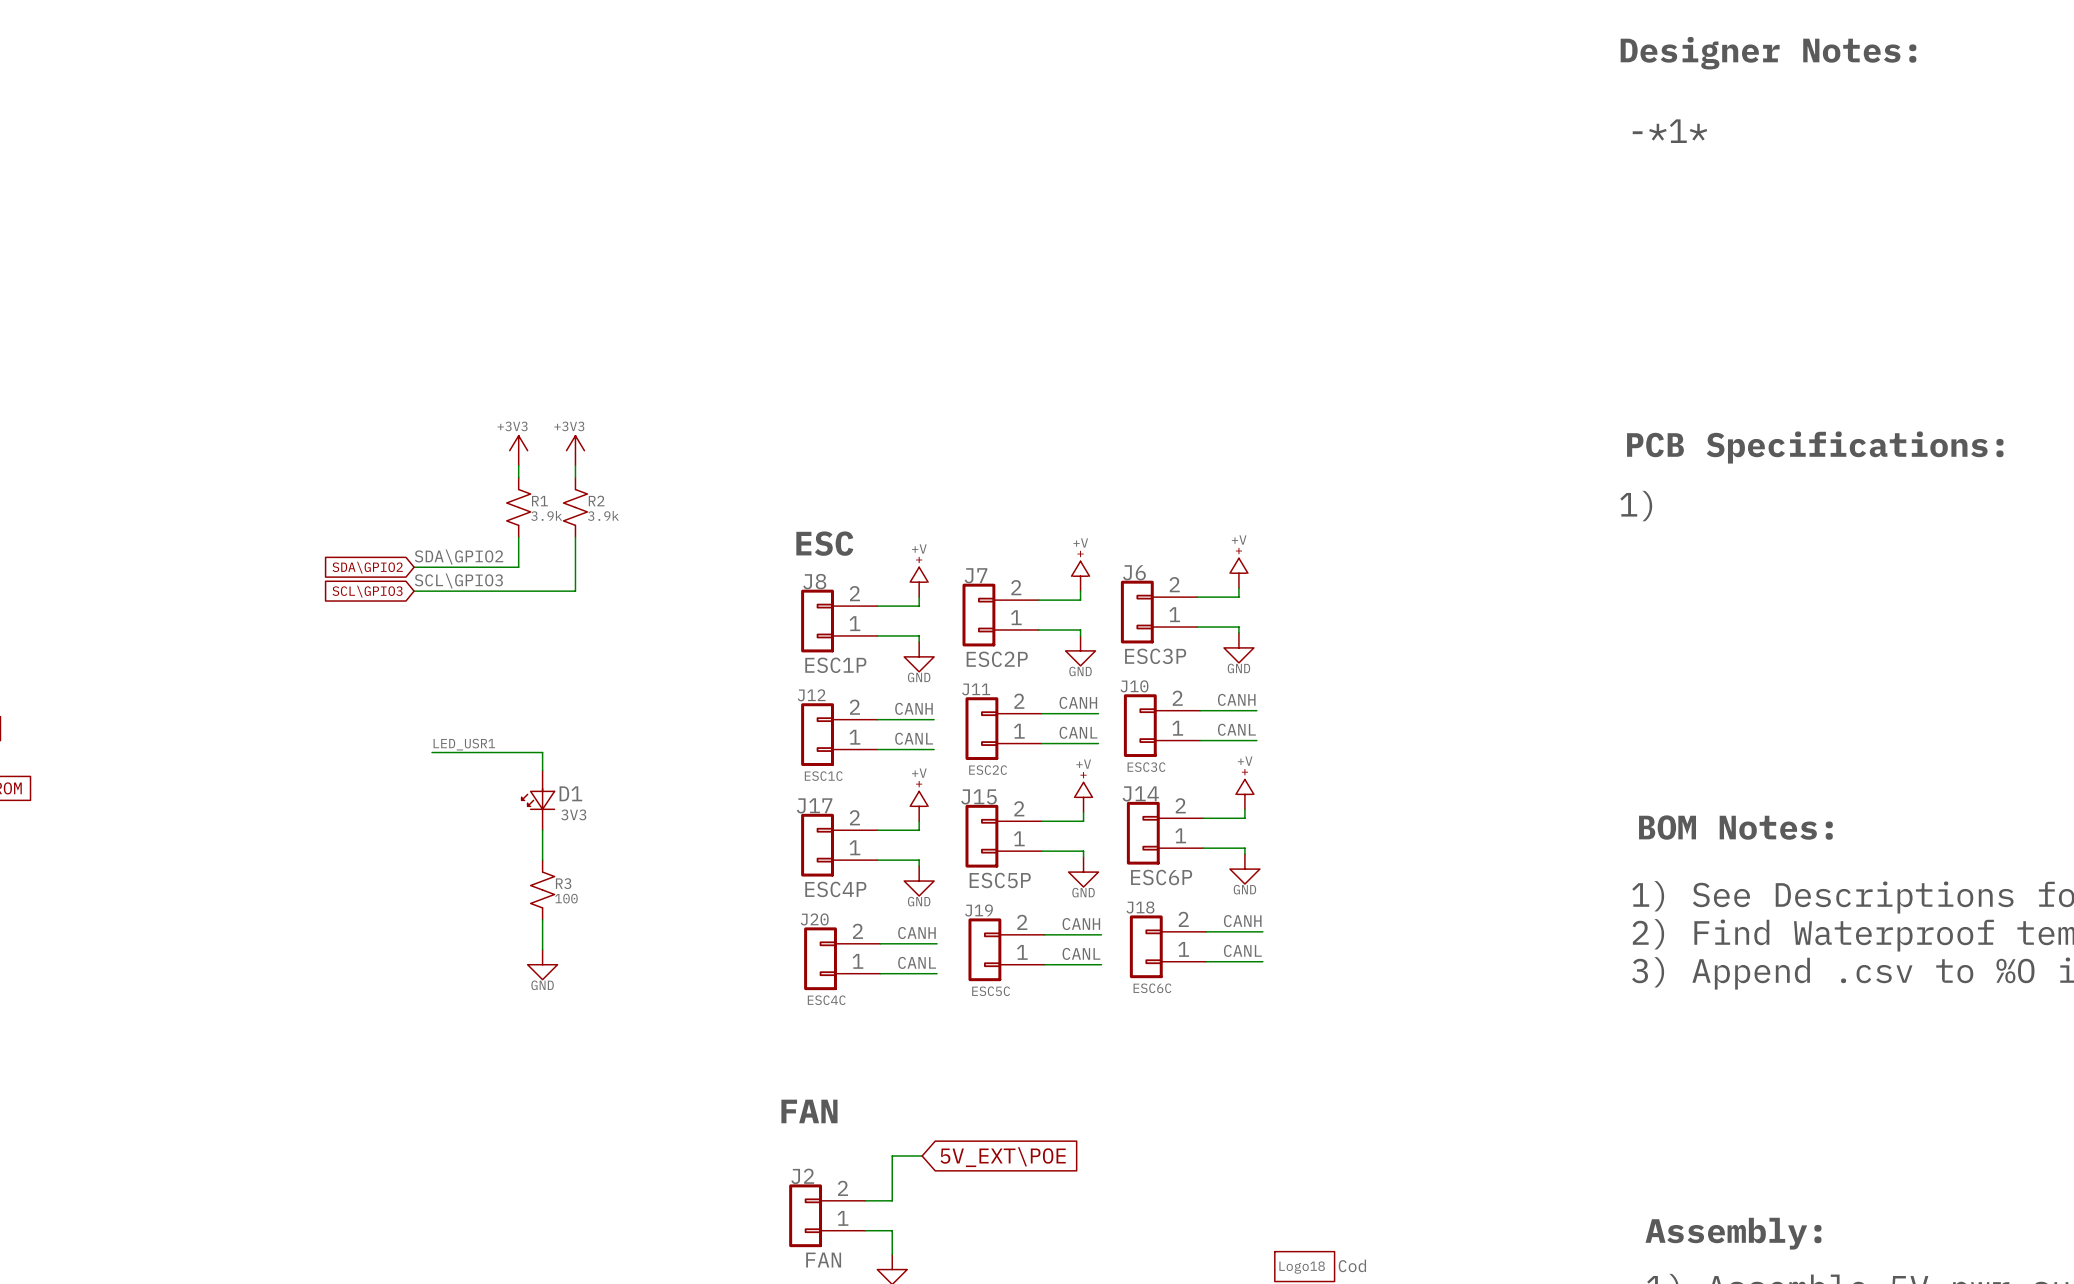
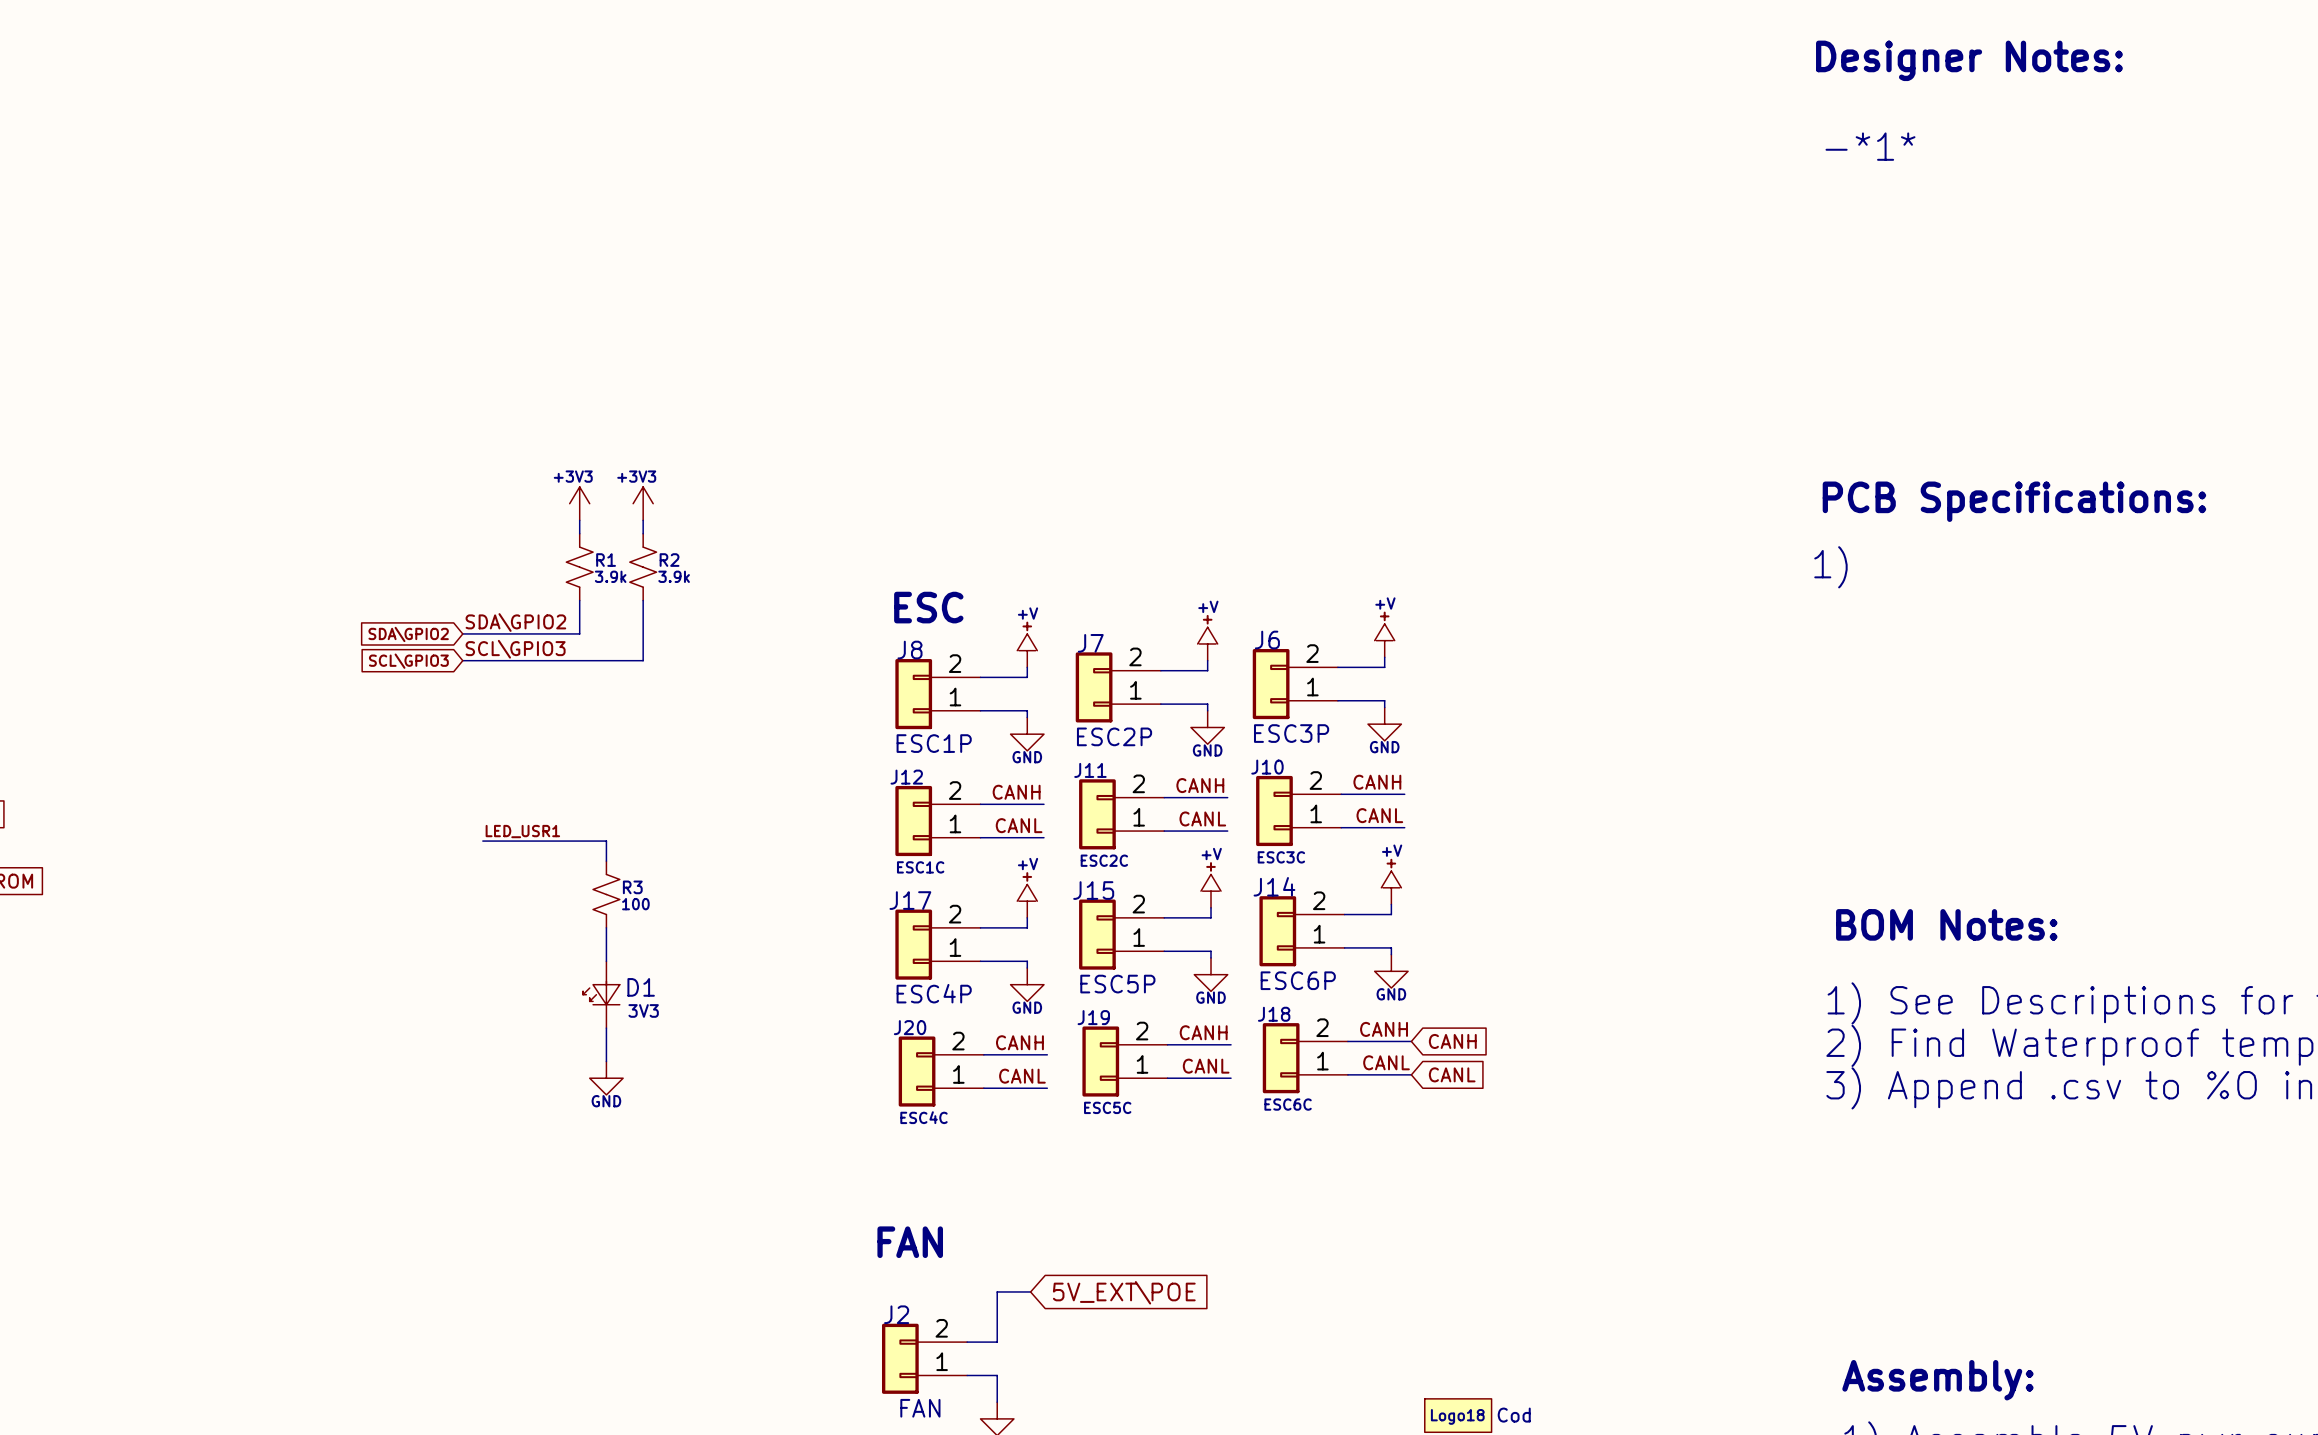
D1 position: (538, 800) -> (601, 994)
R3 position: (542, 890) -> (606, 894)
global label: none -> CANH (1452, 1041)
global label: none -> CANL (1452, 1074)

